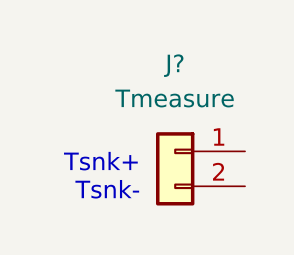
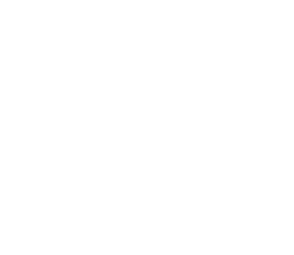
text: Tsnk+ (100, 161) -> none
J?: Tmeasure (200, 168) -> none
text: Tsnk- (107, 189) -> none

